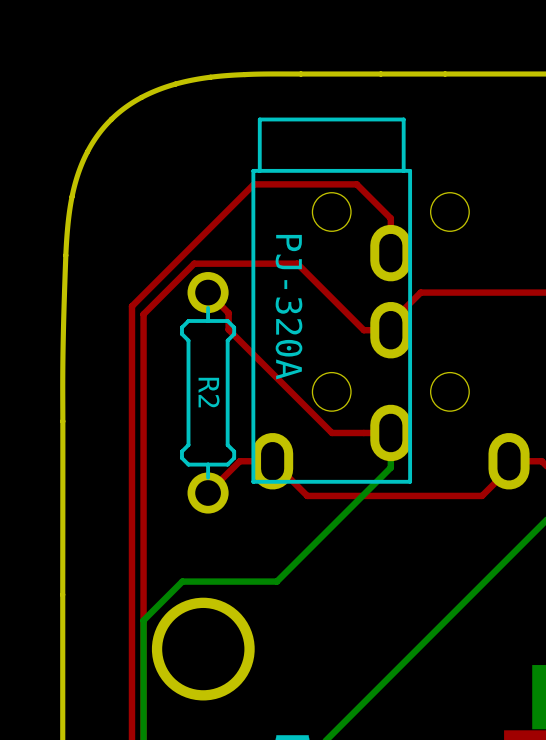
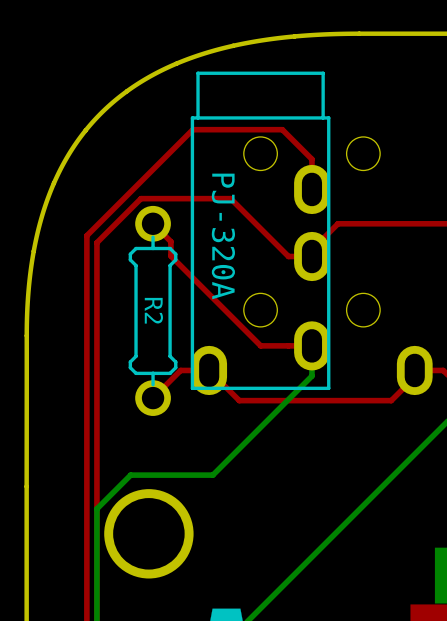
board edge: (445, 74) (263, 74) (210, 77) (181, 82) (156, 90) (133, 102) (115, 115) (98, 133) (86, 154) (76, 178) (70, 203) (65, 273) (62, 421) -> (359, 33) (278, 38) (211, 51) (180, 62) (154, 74) (129, 89) (107, 106) (87, 127) (72, 148) (57, 175) (46, 202) (37, 232) (31, 265) (26, 335)

